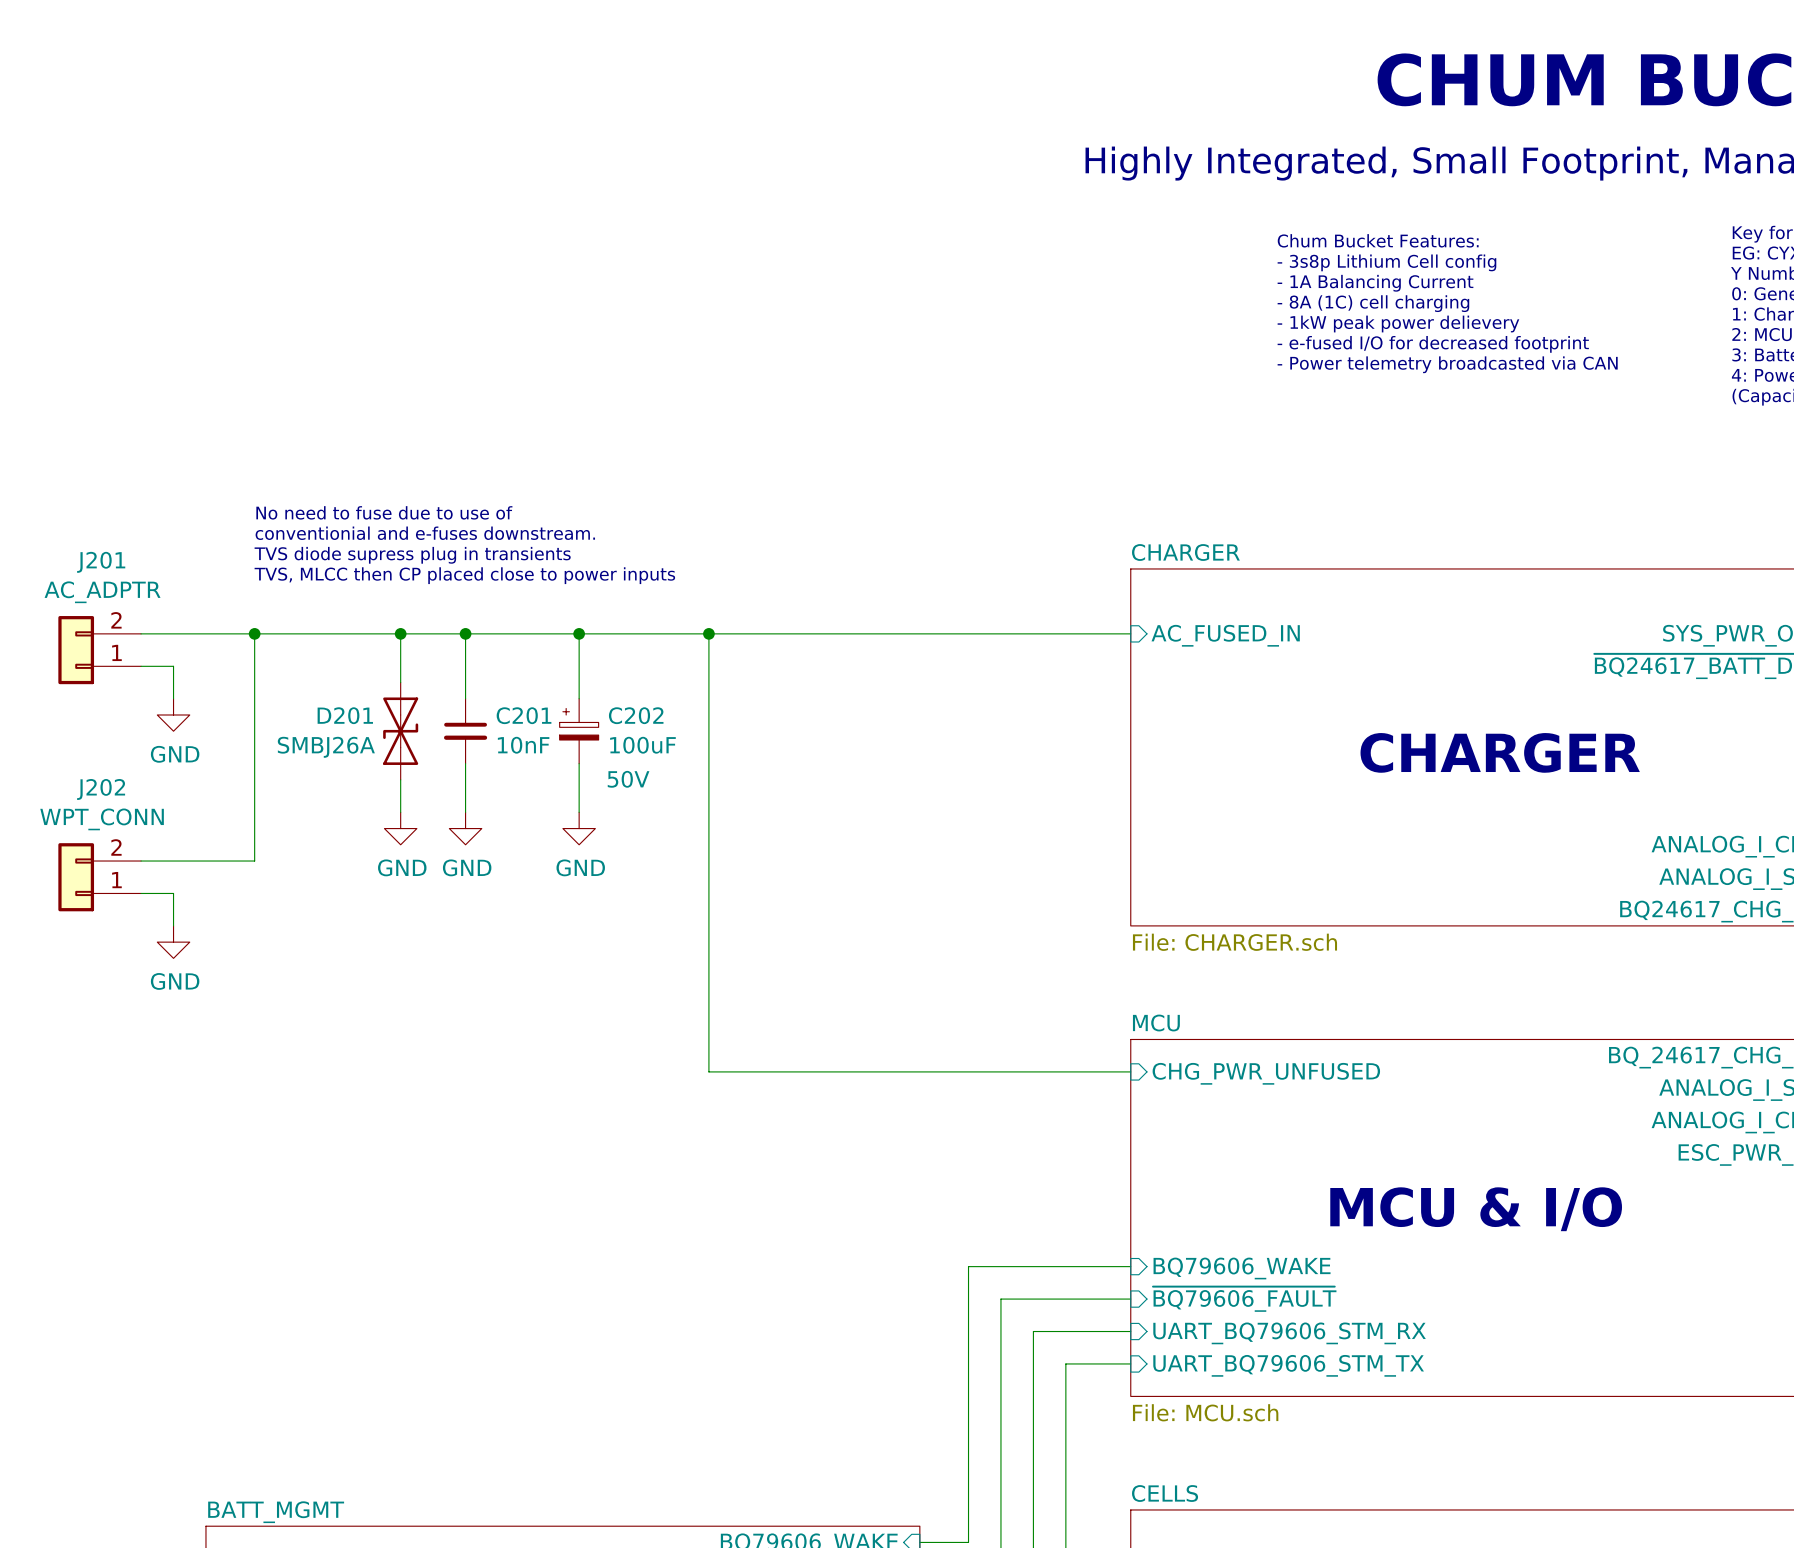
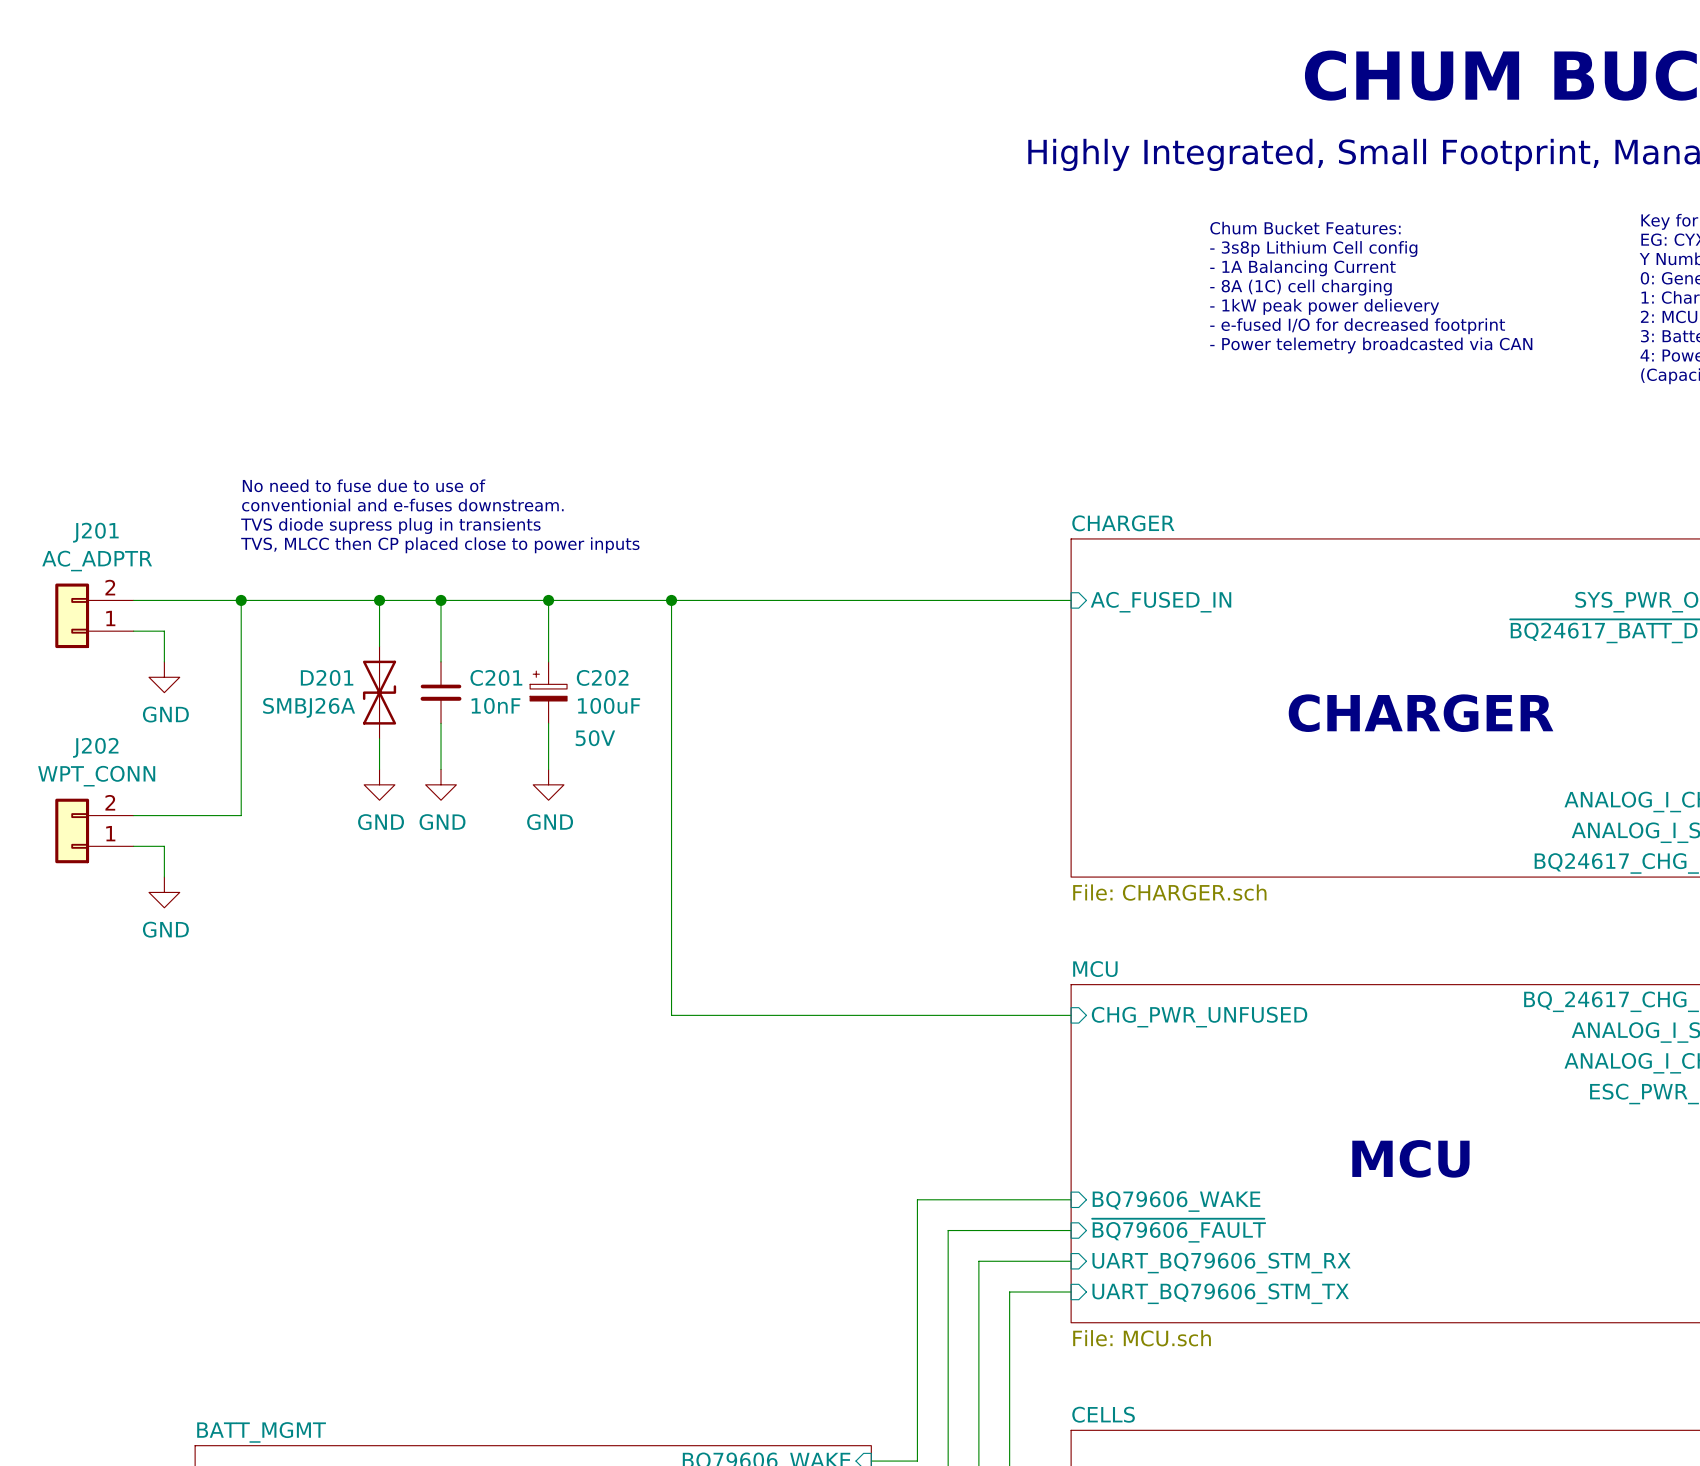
text: MCU & I/O (1476, 1209) -> none
text: none -> MCU (1410, 1158)

